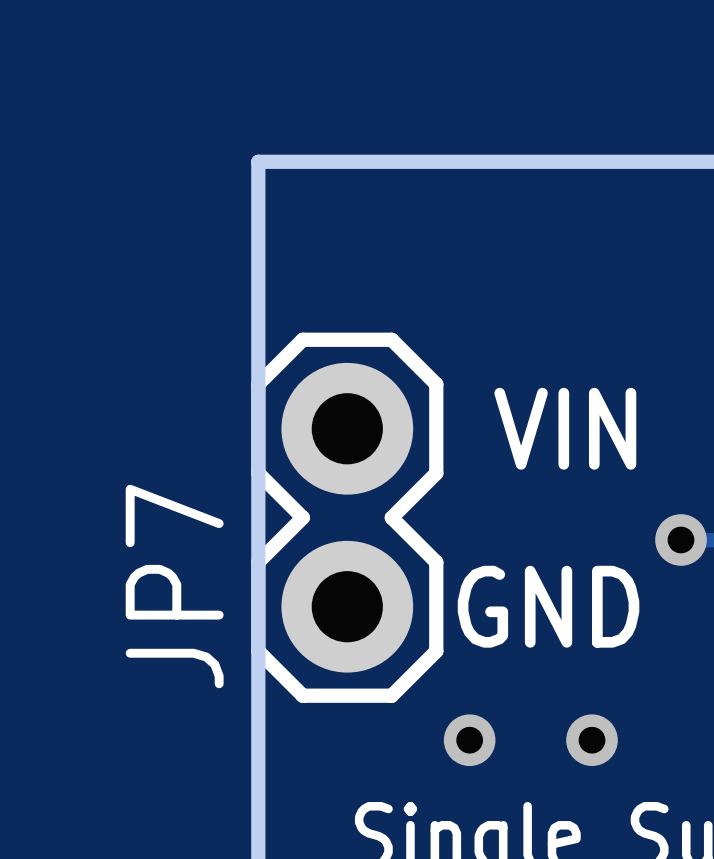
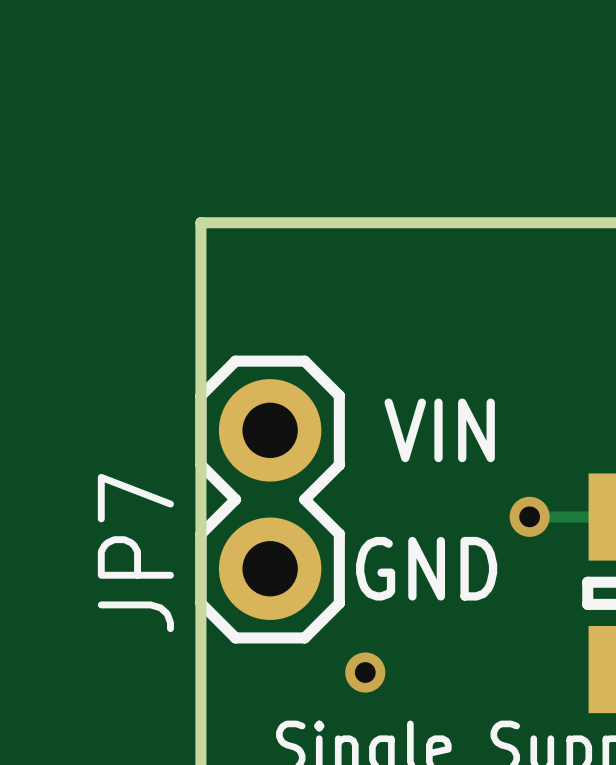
via: (592, 740) -> none

